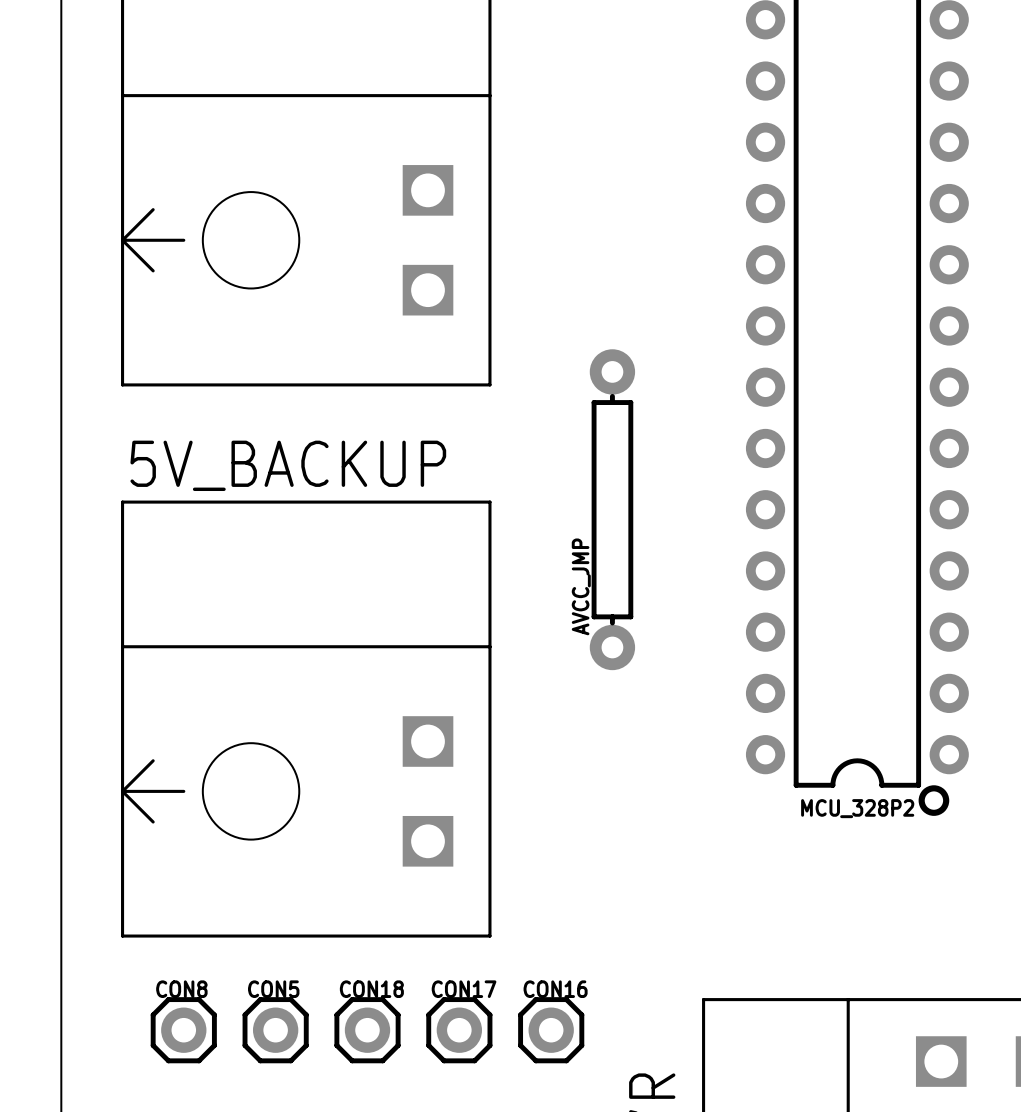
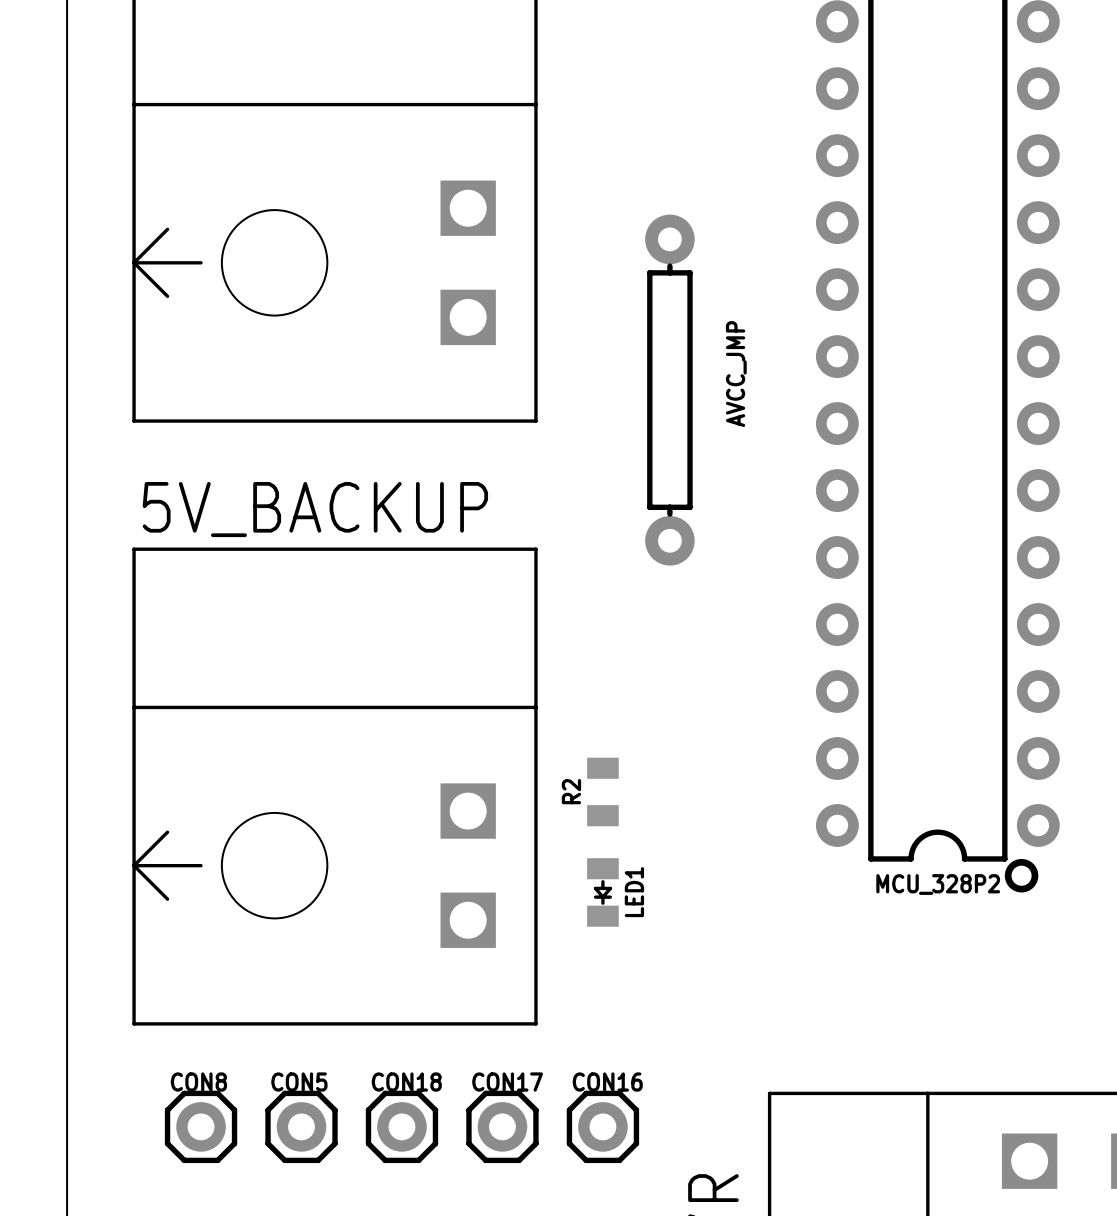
AVCC_JMP position: (612, 509) -> (669, 390)
AVCC_JMP name position: AVCC_JMP (581, 586) -> AVCC_JMP (736, 374)
R2: none -> (602, 791)
LED1: none -> (602, 892)

